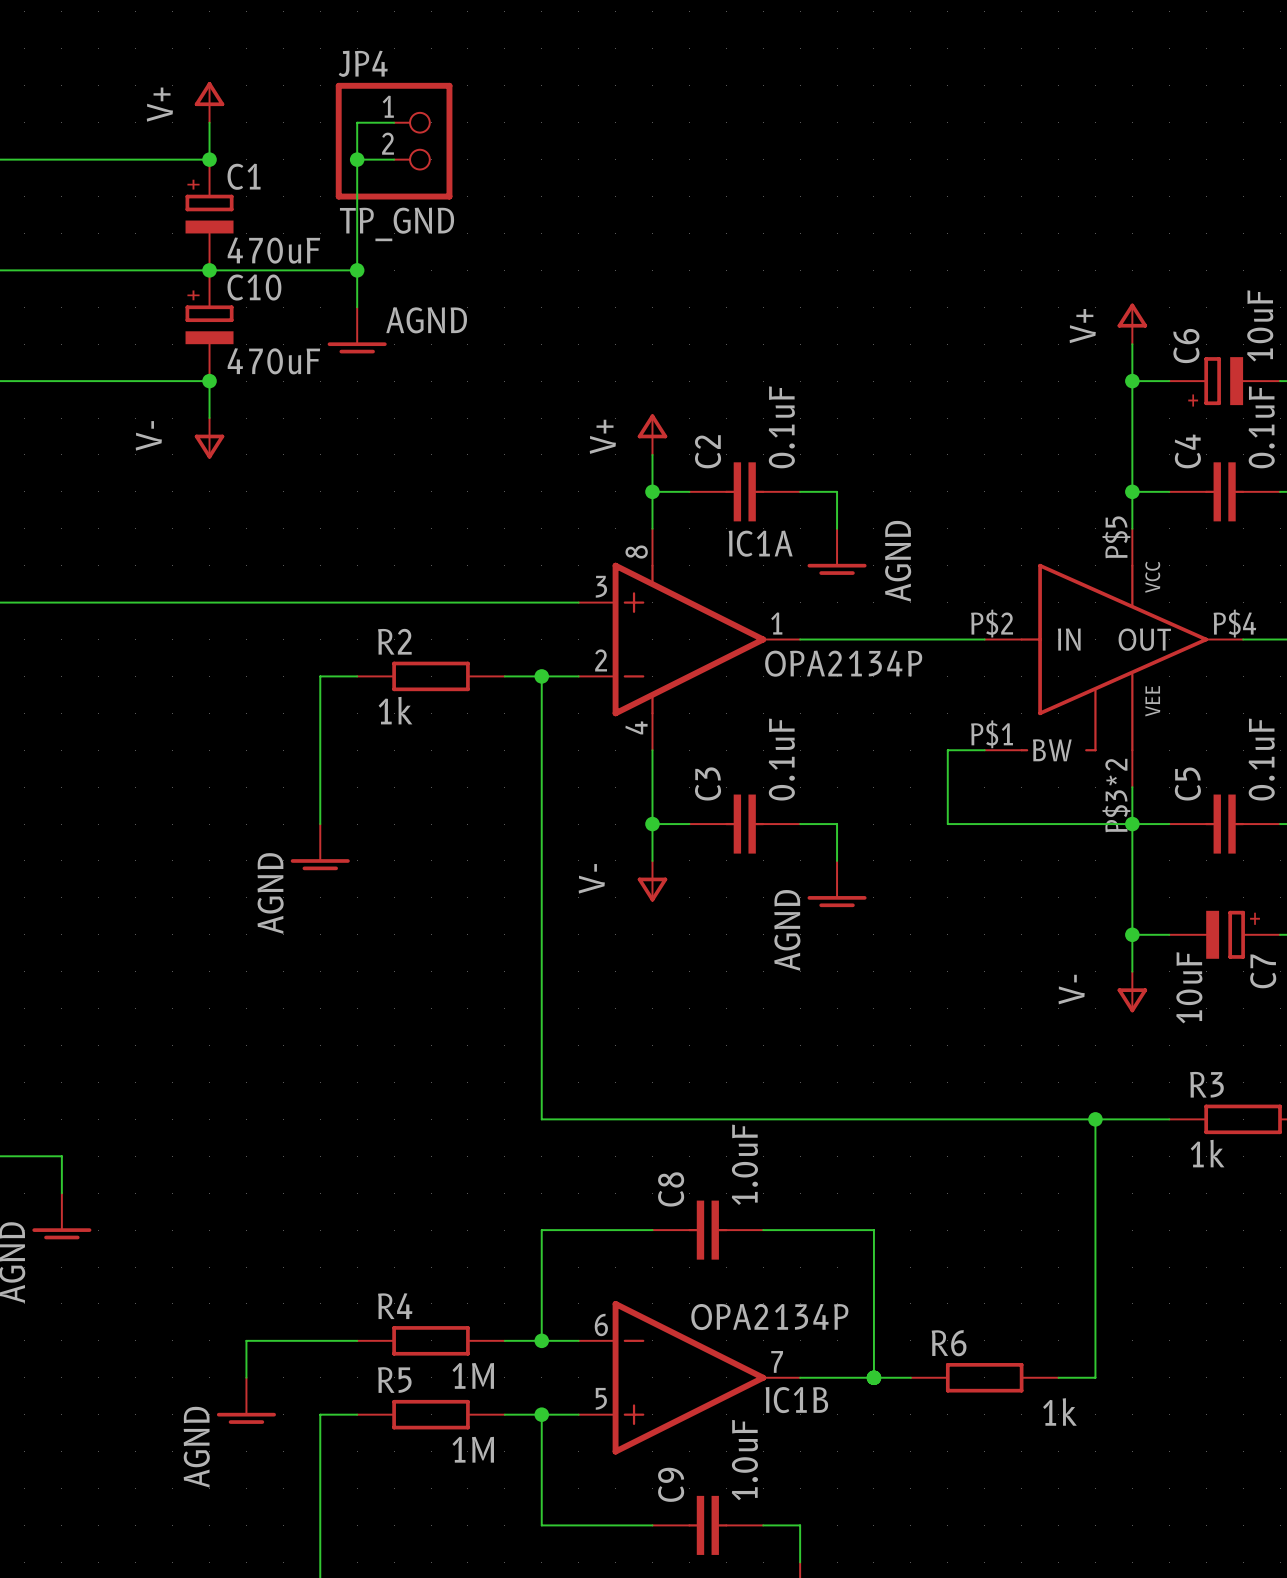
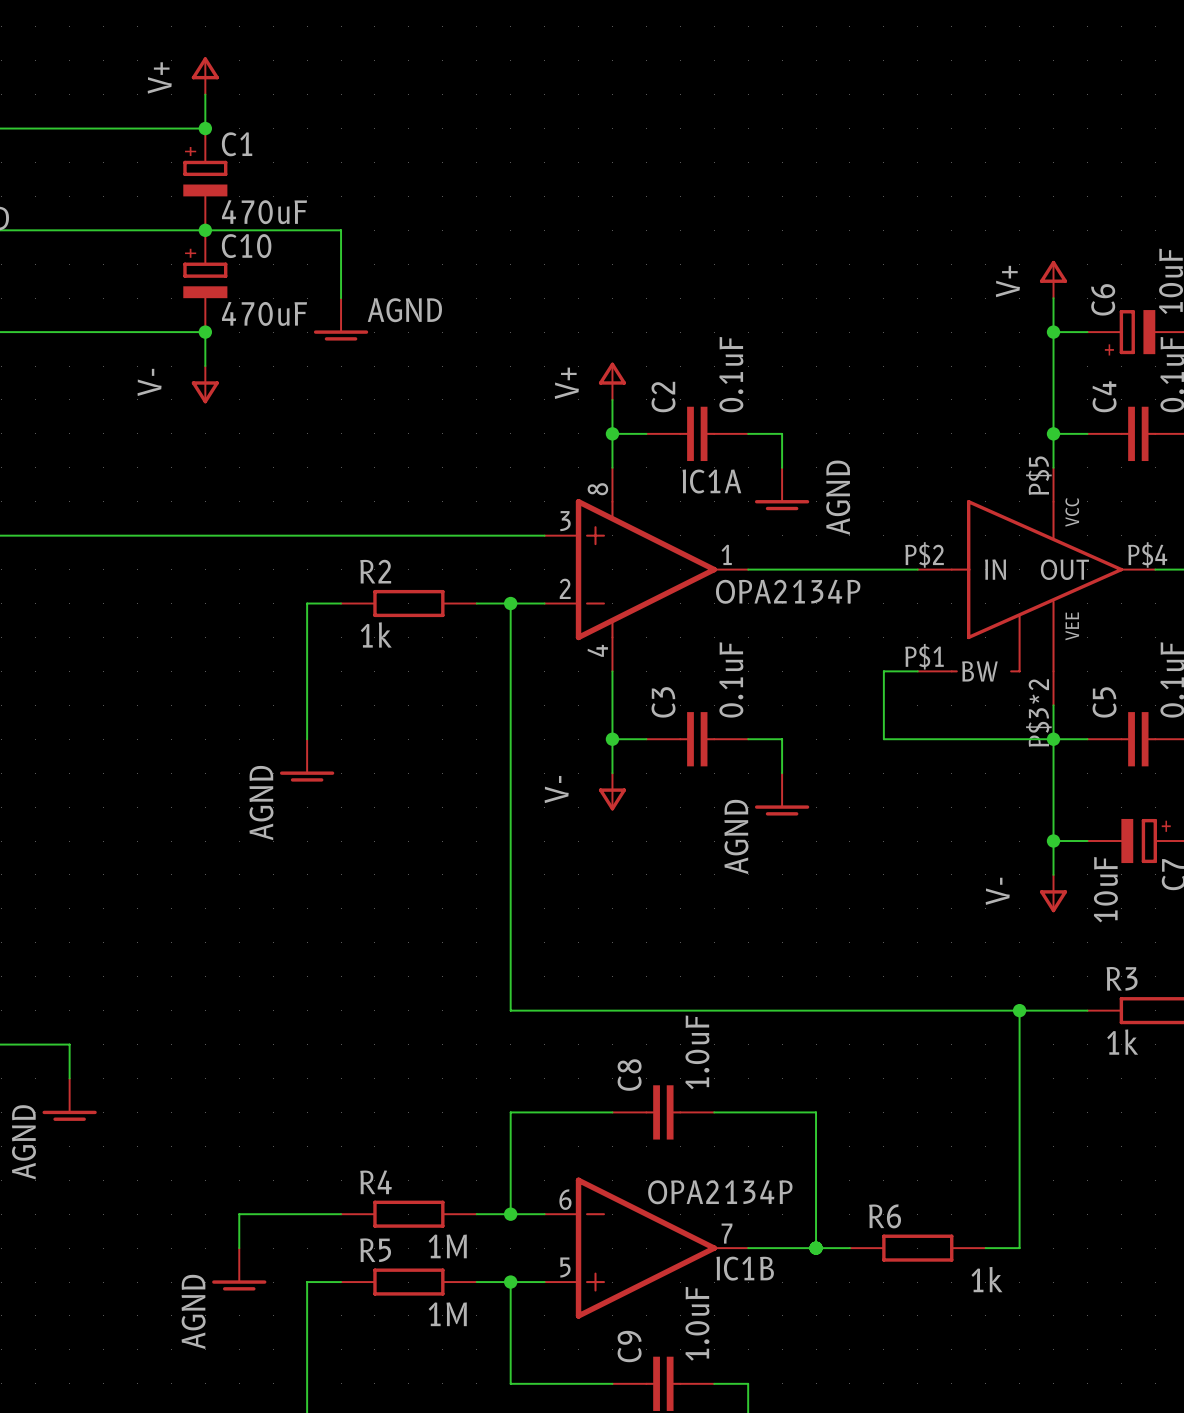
wire: (394, 122) (357, 122) (357, 270) -> none
JP4: TP_GND (394, 141) -> none
wire: (357, 159) (394, 159) -> none
junction: (357, 159) -> none
junction: (357, 270) -> none
power symbol position: AGND (357, 330) -> AGND (341, 319)

